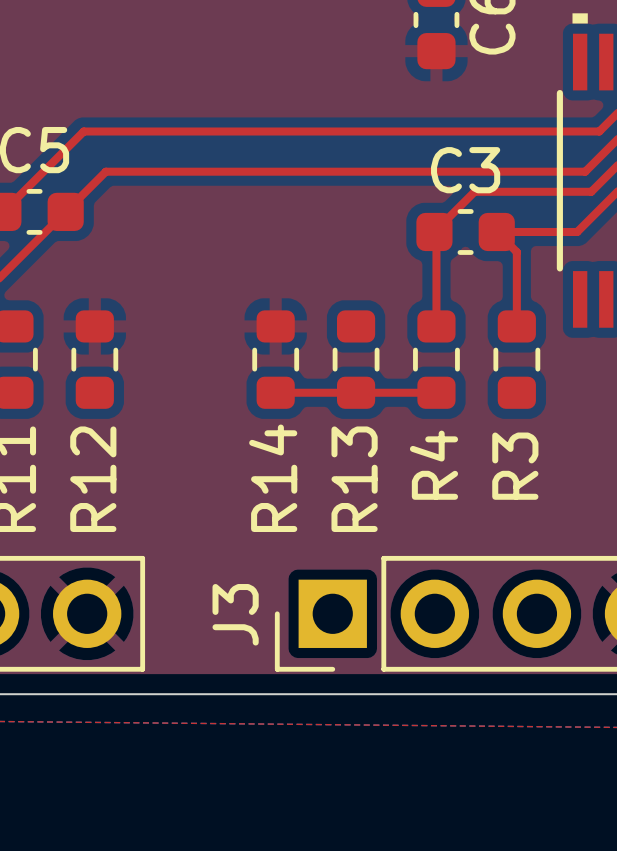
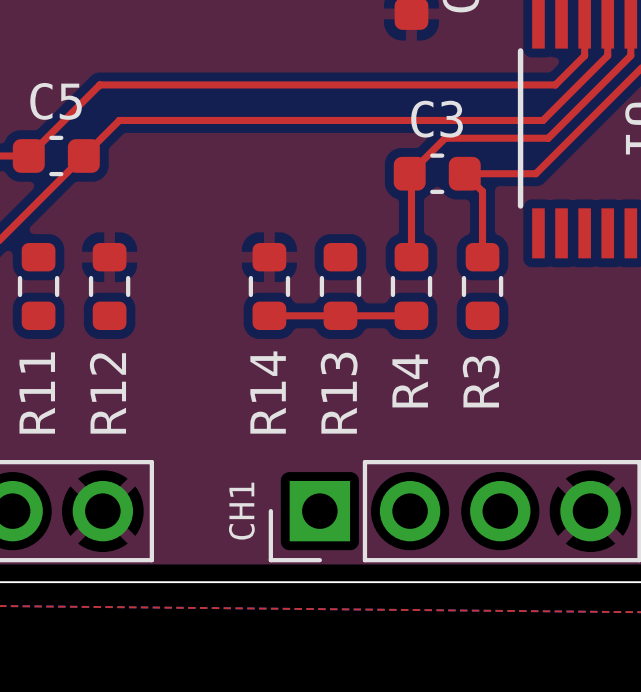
J3 text: none -> CH1 (241, 511)
J3 name: J3 (235, 614) -> none

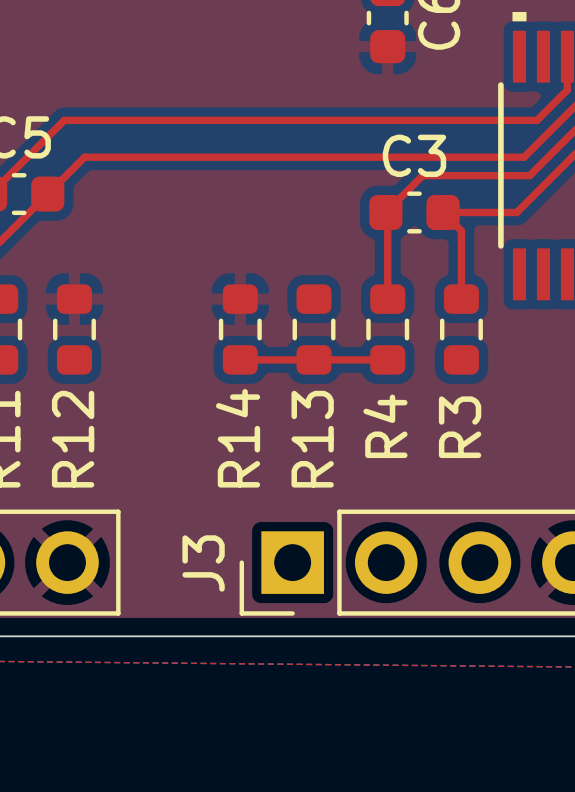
J3 name: none -> J3 (203, 563)
J3 text: CH1 (241, 511) -> none

